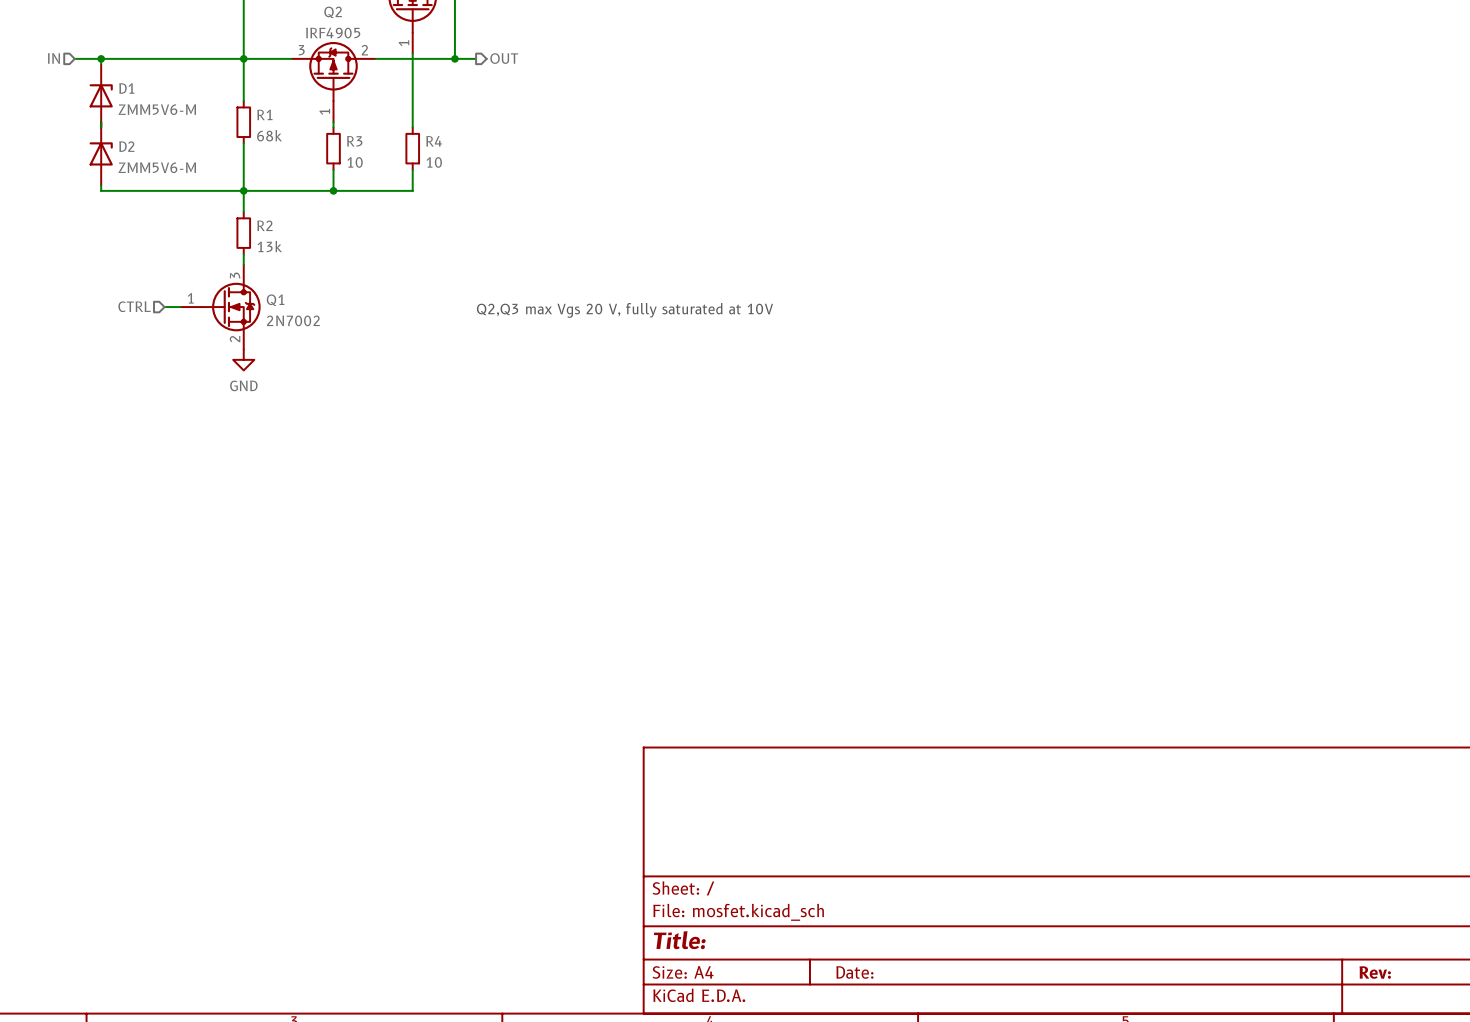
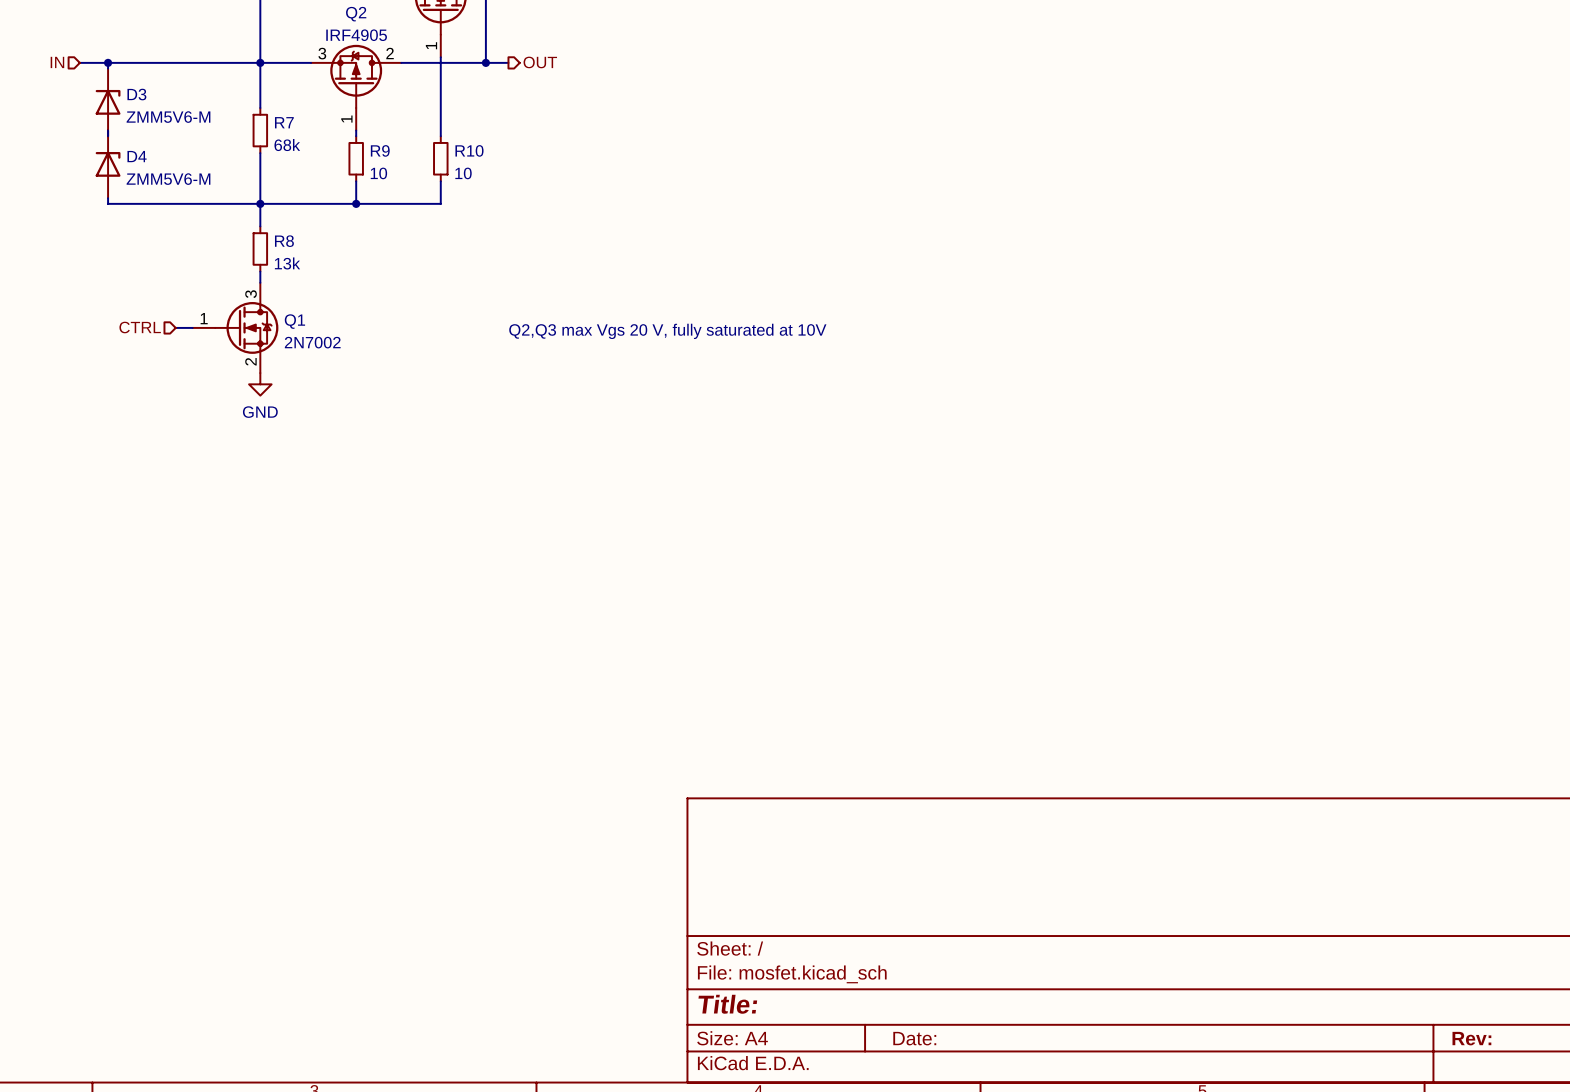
D1 name: D1 (126, 88) -> D3 (136, 94)
R1 name: R1 (264, 114) -> R7 (284, 122)
R3 name: R3 (354, 141) -> R9 (380, 150)
R4 name: R4 (434, 141) -> R10 (469, 150)
D2 name: D2 (126, 146) -> D4 (137, 156)
R2 name: R2 (264, 225) -> R8 (284, 241)

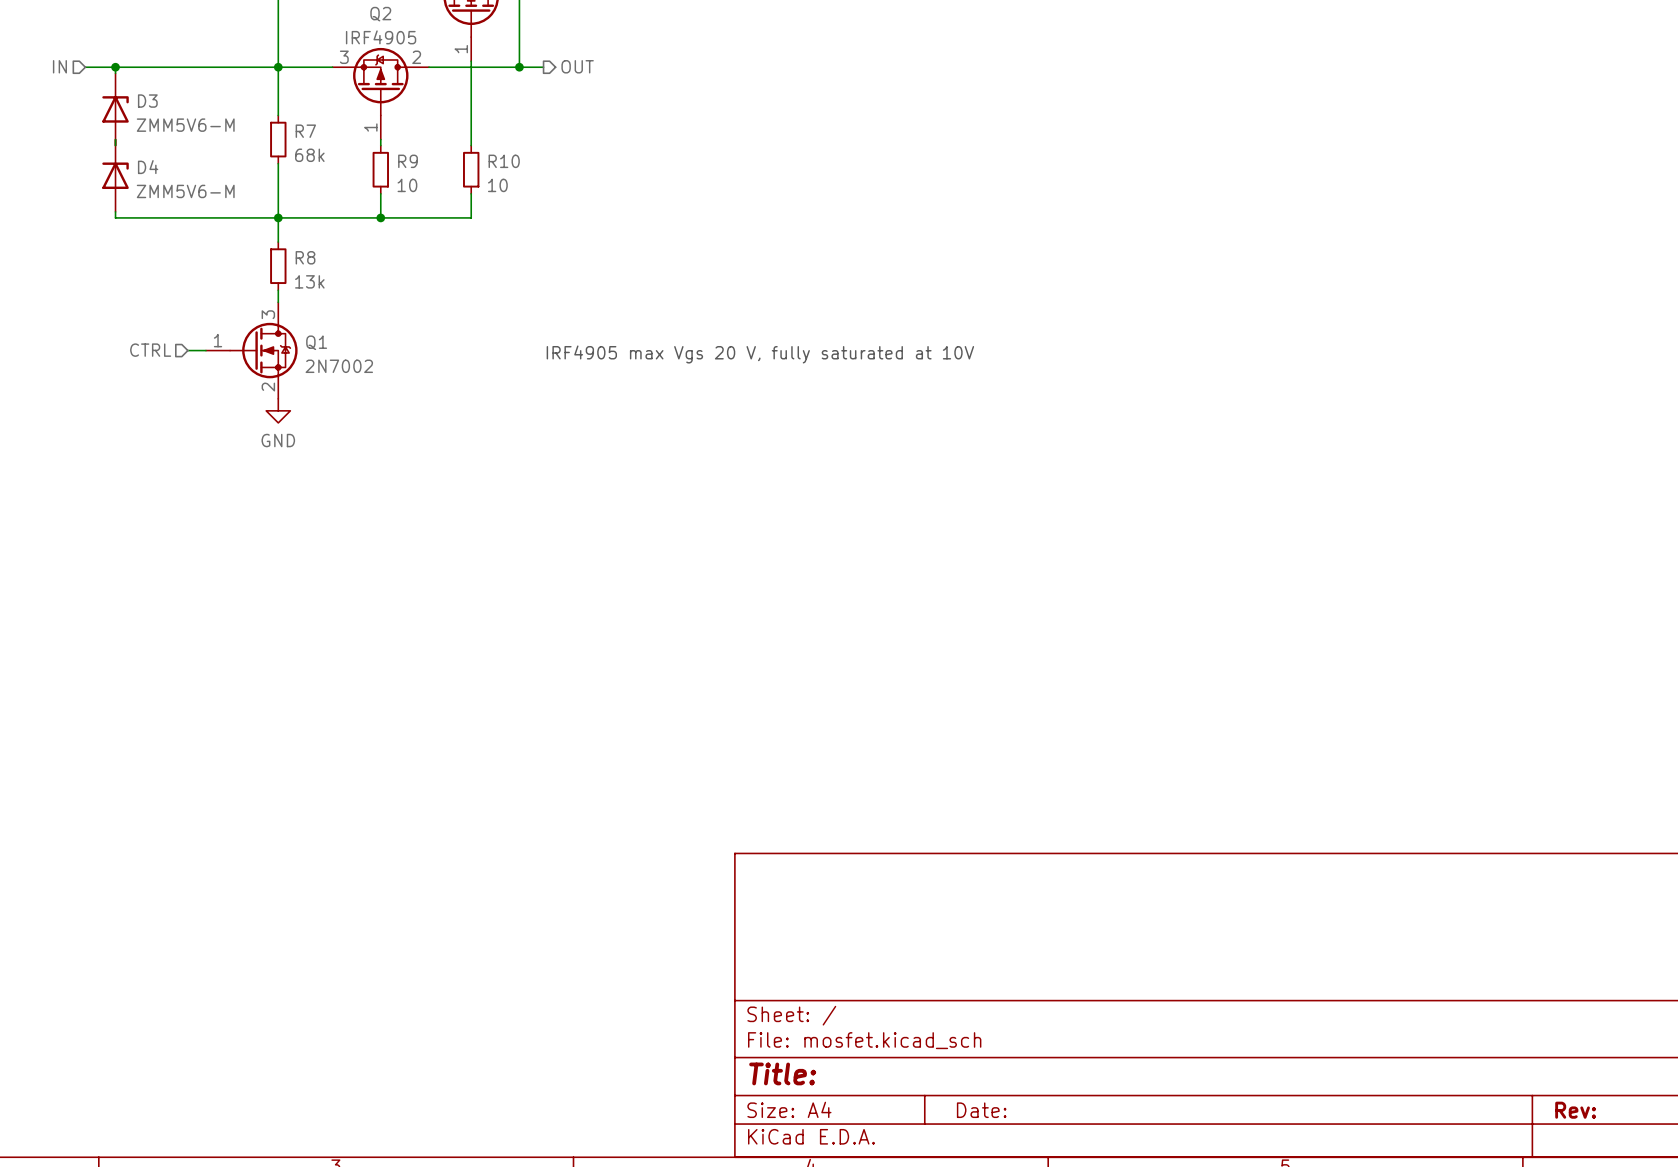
text: Q2,Q3 max Vgs 20 V, fully saturated at 10V (667, 331) -> IRF4905 max Vgs 20 V, fully saturated at 10V (760, 354)

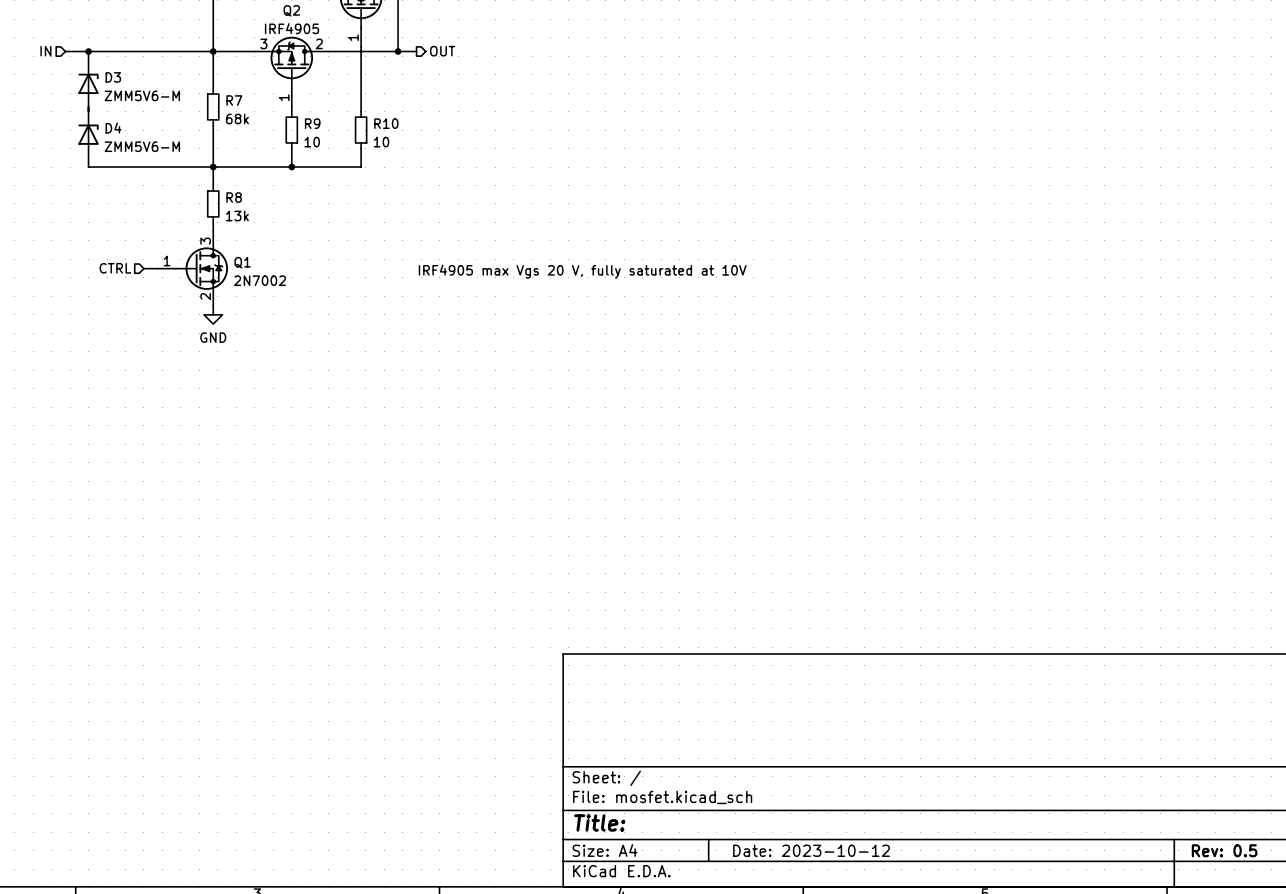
title block: Date: (981, 1110) -> Date: 2023-10-12 (811, 850)
title block: Rev: (1575, 1110) -> Rev: 0.5 (1224, 850)

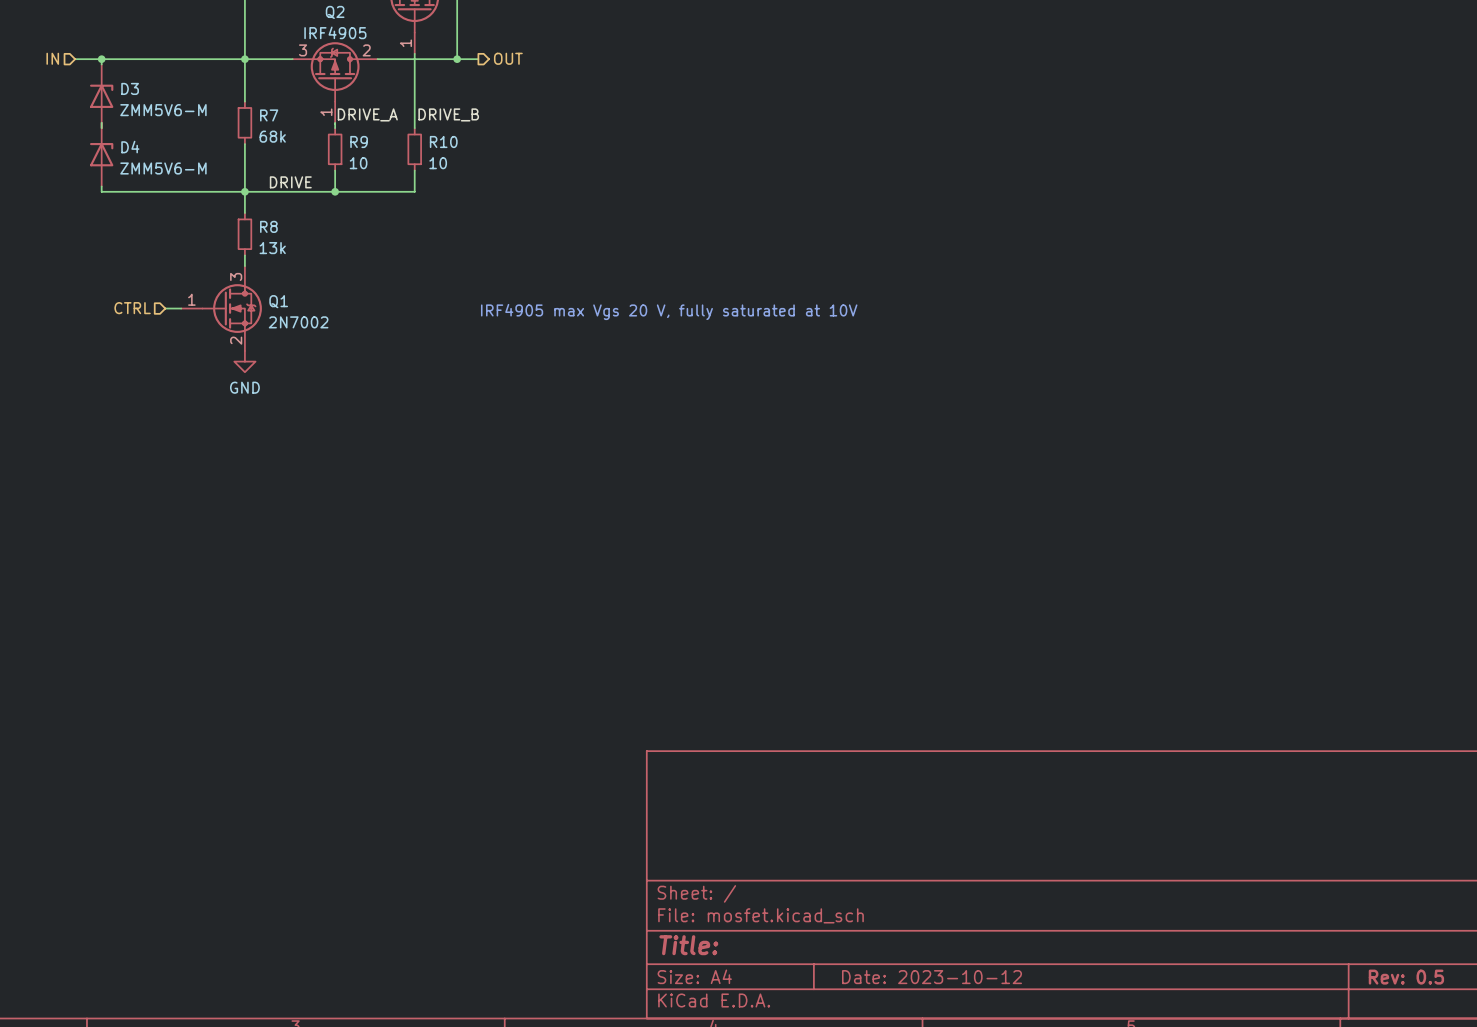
label: none -> DRIVE_A (367, 114)
label: none -> DRIVE_B (448, 114)
label: none -> DRIVE (290, 182)

